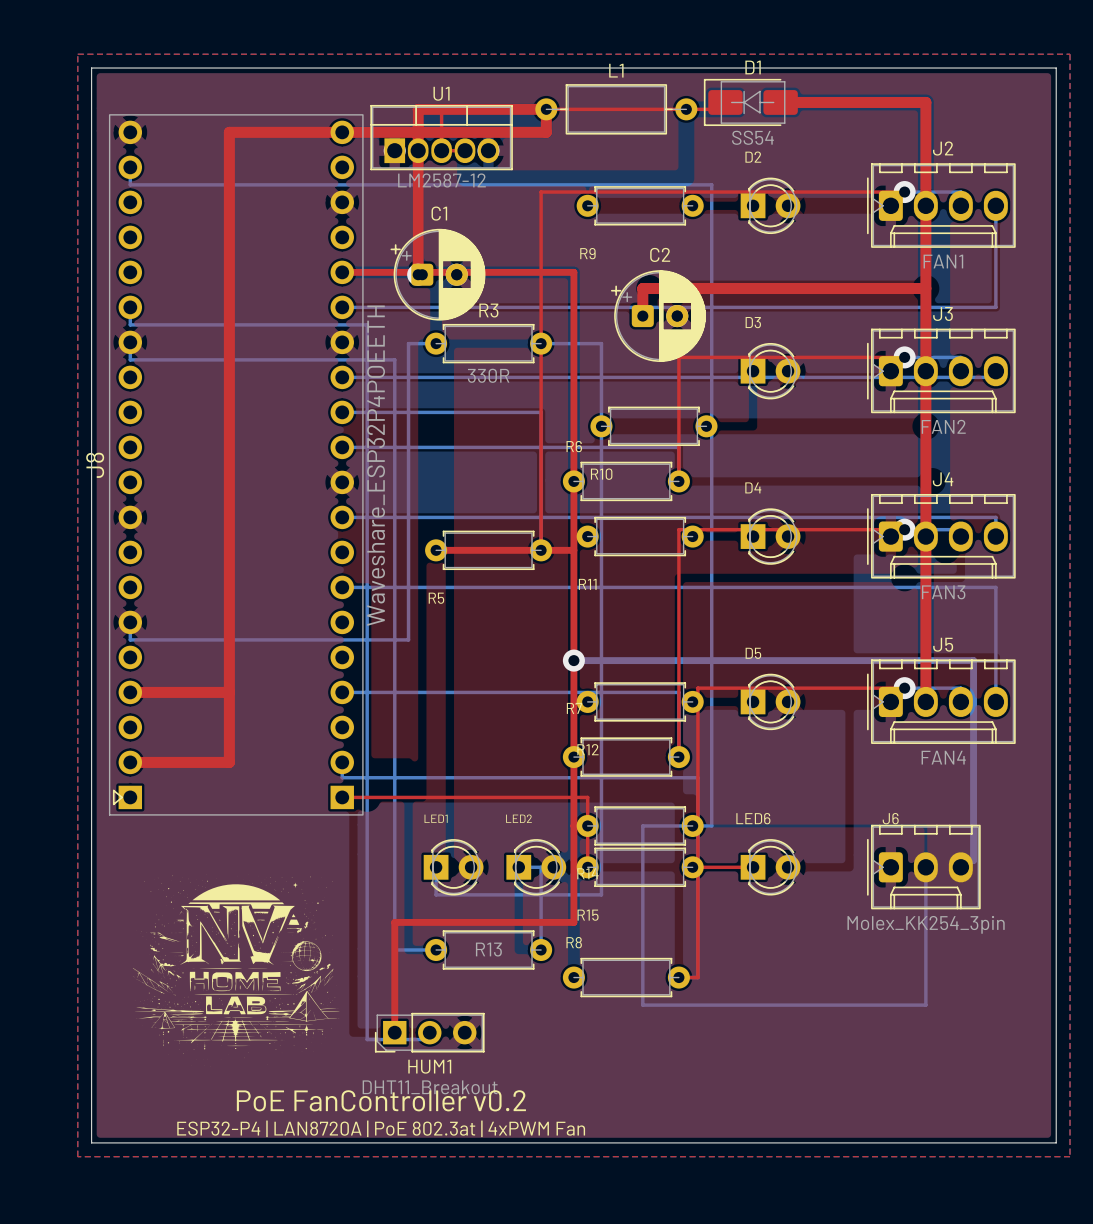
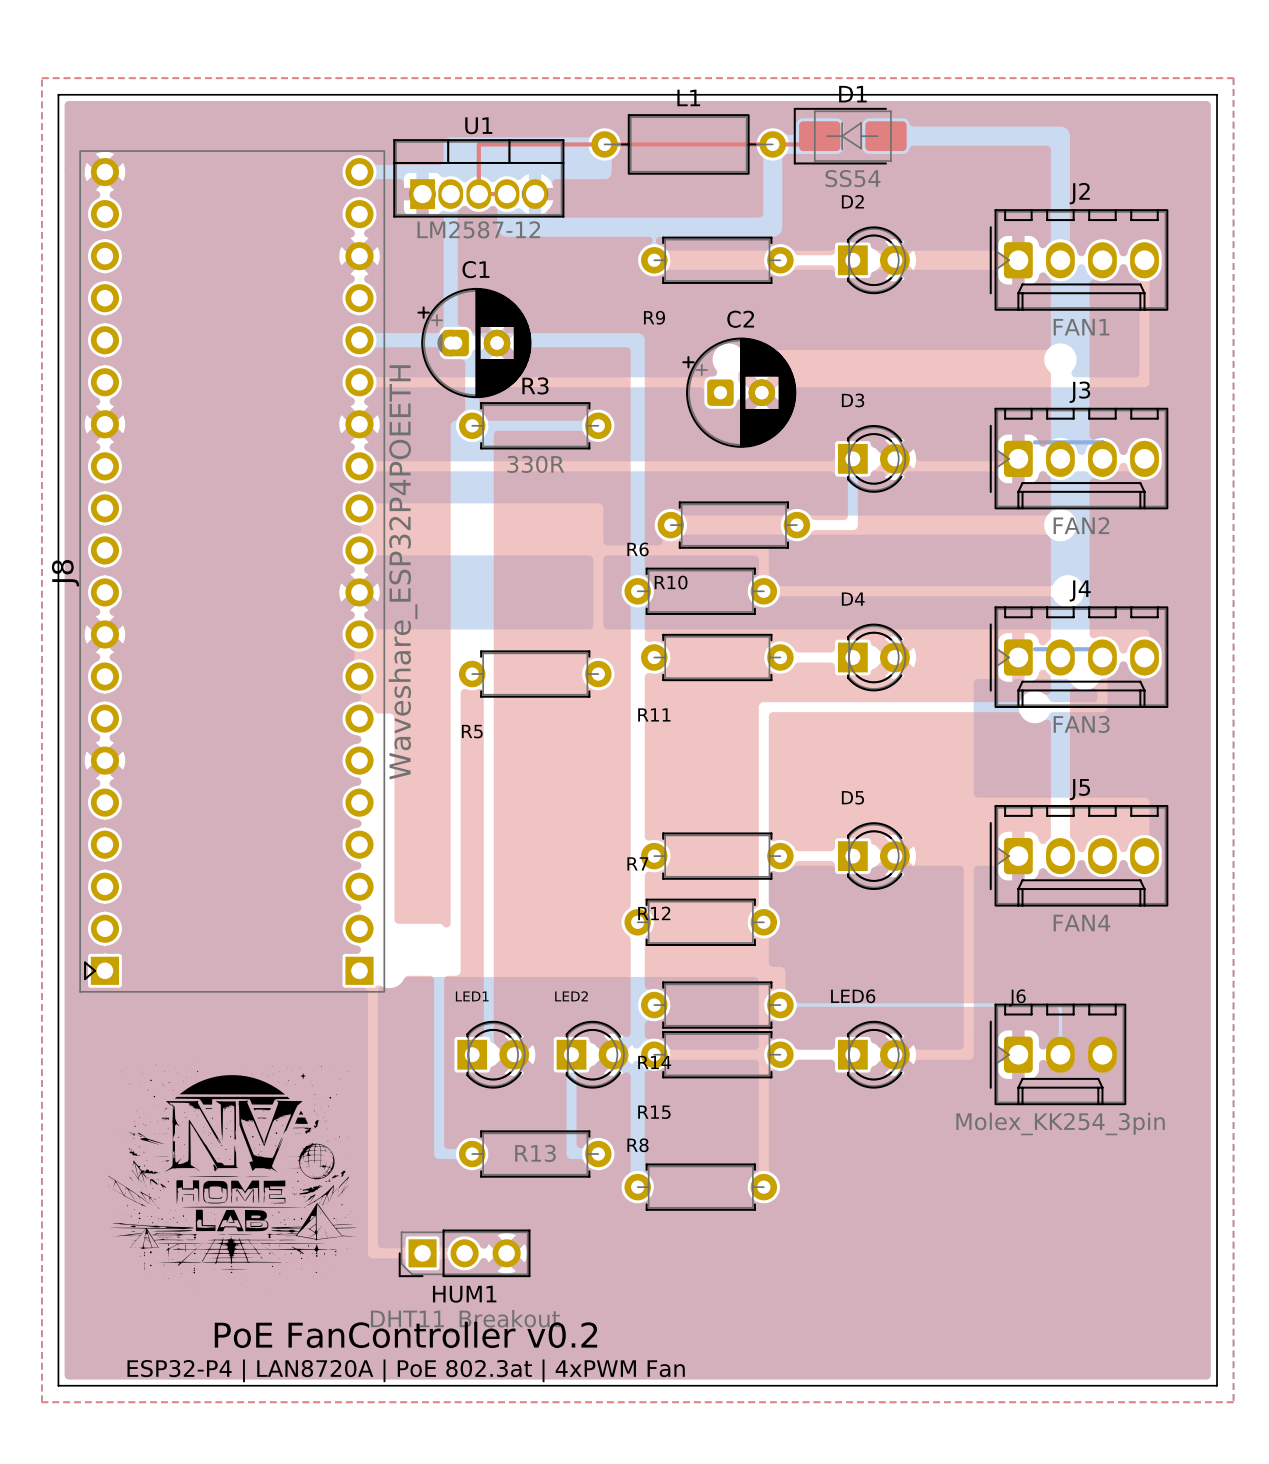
top track: (780, 102) (925, 102) (925, 701) -> none
bottom track: (130, 167) (130, 184) (711, 184) (711, 825) (642, 825) (642, 1005) (925, 1005) (925, 867) -> none
bottom track: (904, 192) (960, 192) (960, 205) -> none
top track: (904, 192) (541, 192) (541, 550) -> none
via: (904, 192) -> none
bottom track: (995, 205) (995, 307) (342, 307) -> none
top track: (342, 272) (573, 272) (573, 922) (394, 922) (394, 1032) -> none
top track: (422, 274) (418, 274) (418, 109) (546, 109) (546, 132) (229, 132) (229, 762) (130, 762) -> none
top track: (925, 288) (642, 288) (642, 316) -> none
bottom track: (130, 307) (130, 324) (367, 324) (367, 1039) (429, 1039) (429, 1032) -> none
bottom track: (130, 342) (130, 359) (394, 359) (394, 949) (436, 949) -> none
bottom track: (436, 343) (408, 343) (408, 639) (130, 639) (130, 622) -> none
bottom track: (541, 343) (601, 343) (601, 894) (436, 894) (436, 867) -> none
top track: (904, 357) (678, 357) (678, 481) -> none
via: (904, 357) -> none
bottom track: (995, 371) (995, 377) (342, 377) -> none
bottom track: (342, 412) (541, 412) (541, 550) -> none
bottom track: (342, 447) (678, 447) (678, 481) -> none
bottom track: (342, 517) (995, 517) (995, 536) -> none
top track: (904, 529) (678, 529) (678, 757) -> none
via: (904, 529) -> none
top track: (436, 550) (573, 550) -> none
bottom track: (342, 587) (995, 587) (995, 701) -> none
bottom track: (573, 660) (973, 660) (973, 860) (960, 860) (960, 867) -> none
via: (573, 660) -> none
bottom track: (904, 688) (960, 688) (960, 701) -> none
top track: (904, 688) (697, 688) (697, 977) (678, 977) -> none
via: (904, 688) -> none
top track: (130, 692) (229, 692) -> none
bottom track: (342, 692) (678, 692) (678, 757) -> none
bottom track: (342, 762) (342, 777) (697, 777) (697, 977) (678, 977) -> none
top track: (342, 797) (587, 797) (587, 867) -> none
bottom track: (518, 867) (541, 867) (541, 949) -> none
top track: (692, 867) (753, 867) -> none

